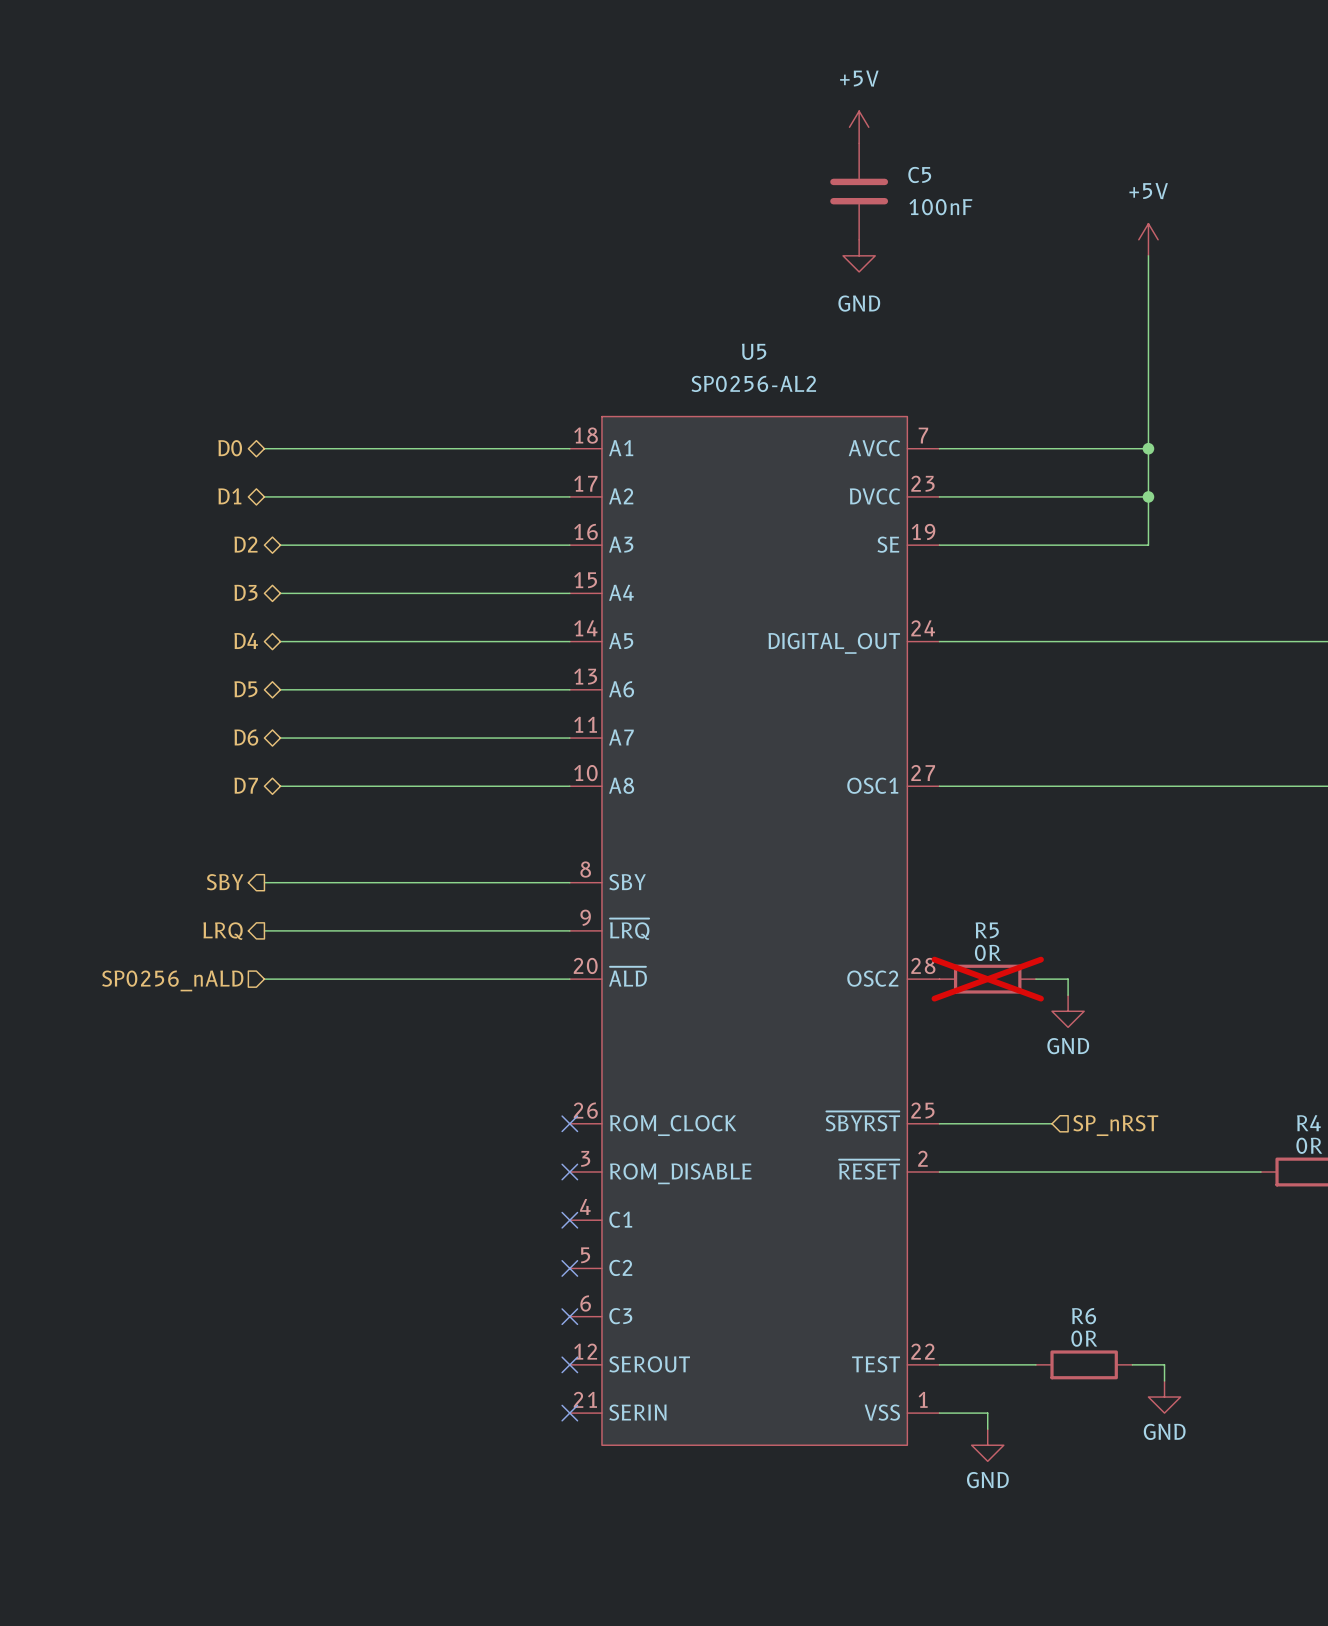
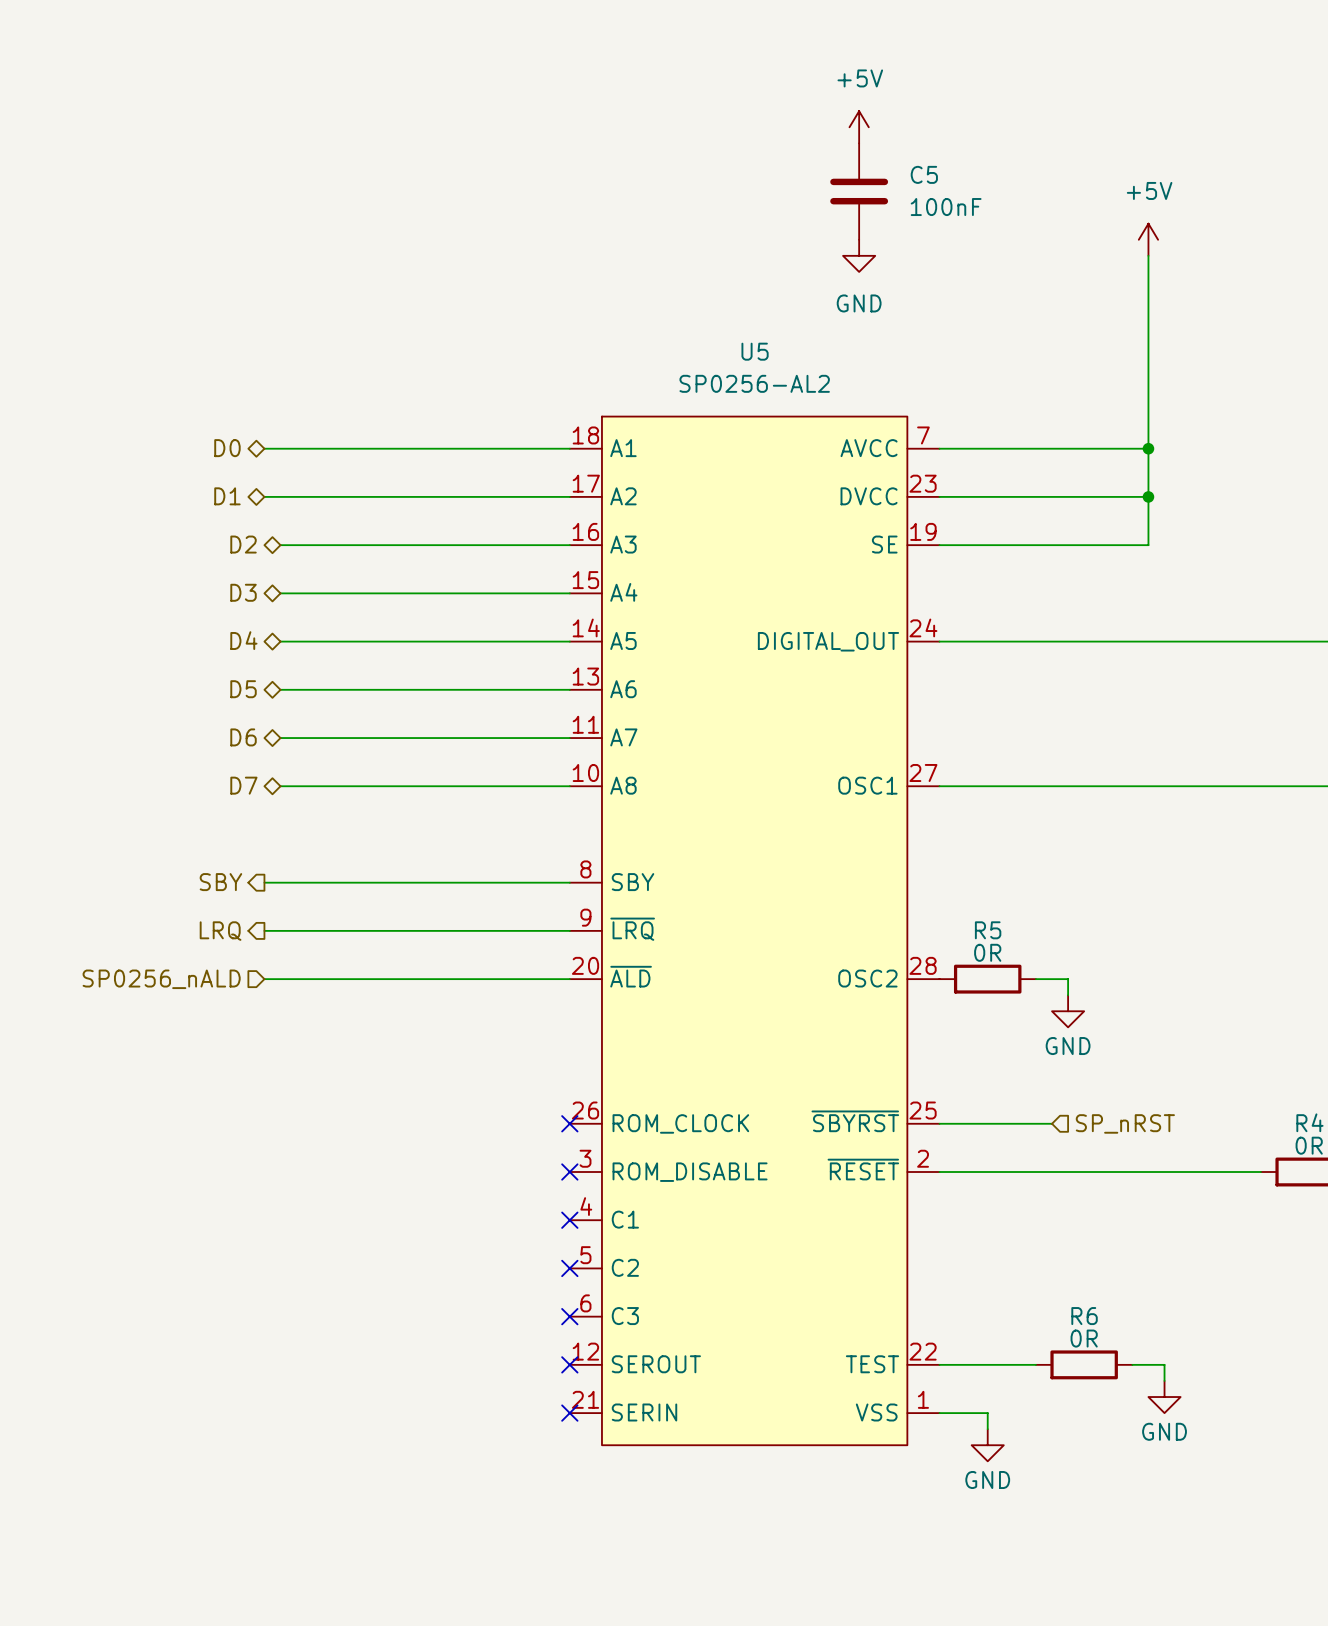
R5 do-not-place cross: (987, 979) -> none

